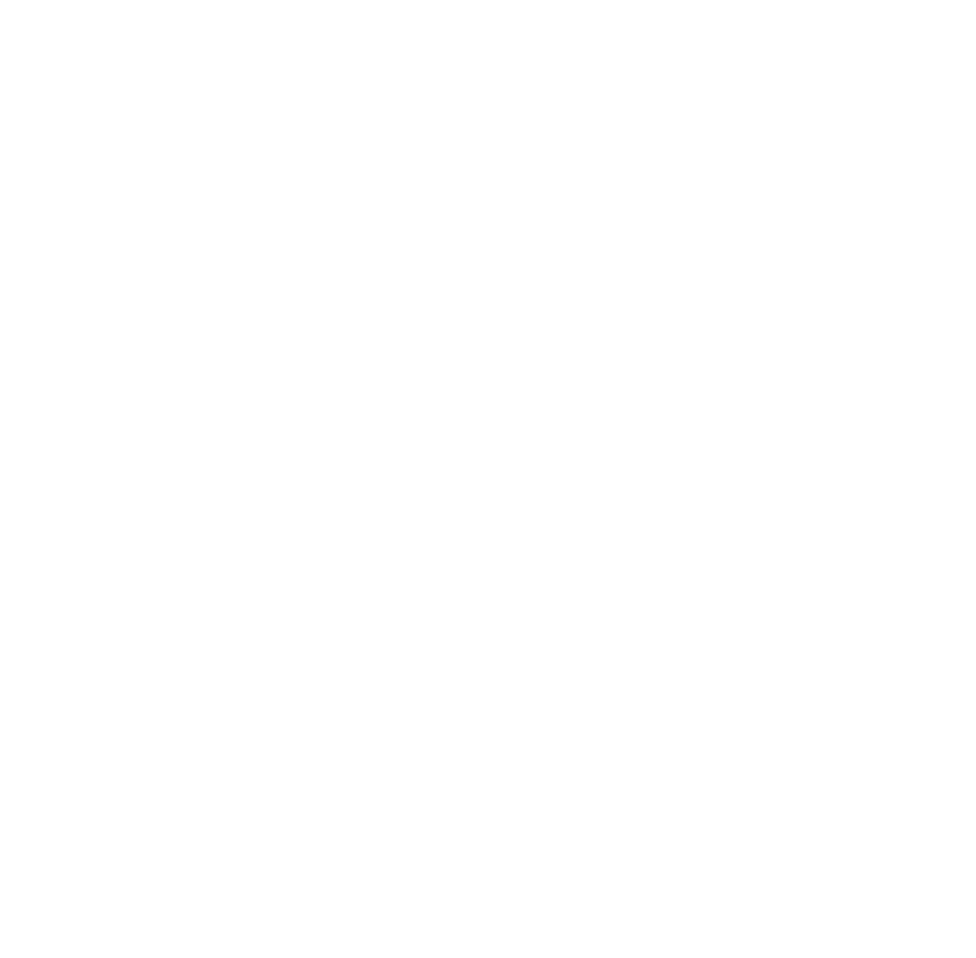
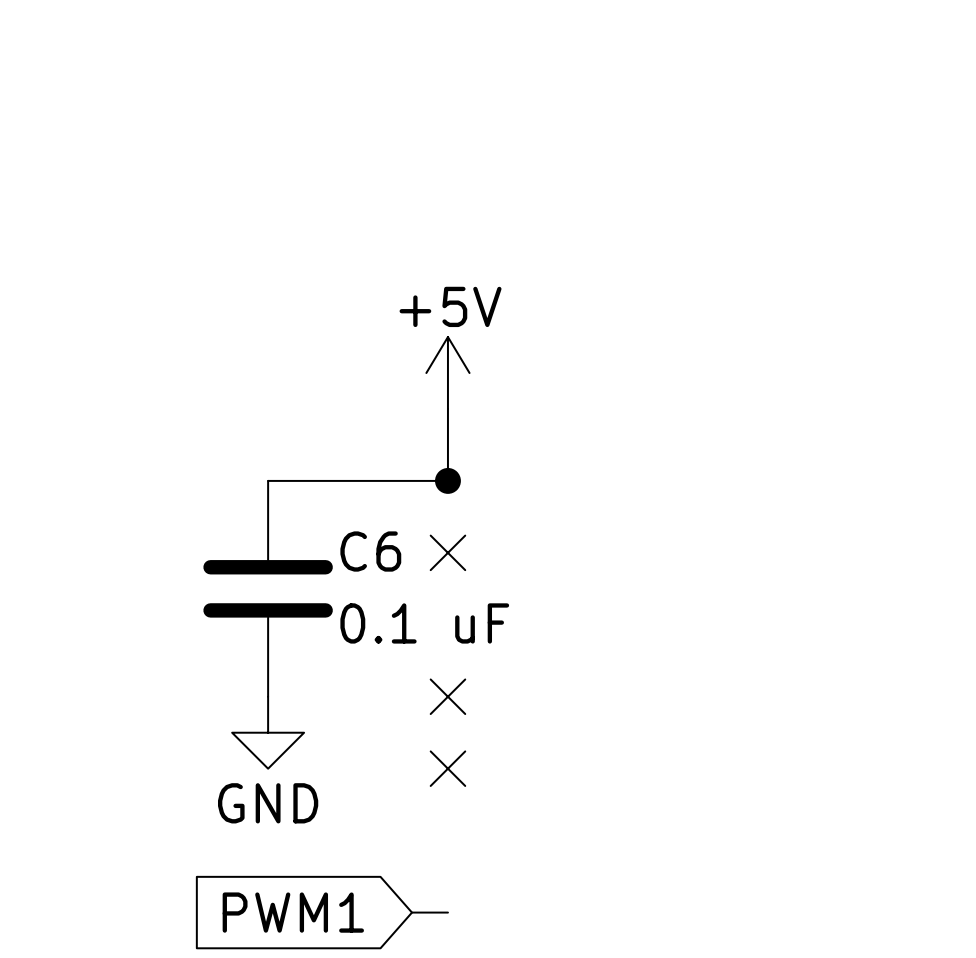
power symbol: none -> +5V (447, 373)
wire: none -> (447, 408) (447, 480) (268, 480)
junction: none -> (447, 480)
no-connect mark: none -> (447, 552)
C6: none -> 0.1 uF (268, 588)
no-connect mark: none -> (447, 696)
power symbol: none -> GND (268, 732)
no-connect mark: none -> (447, 768)
global label: none -> PWM1 (293, 912)
wire: none -> (411, 912) (447, 912)

